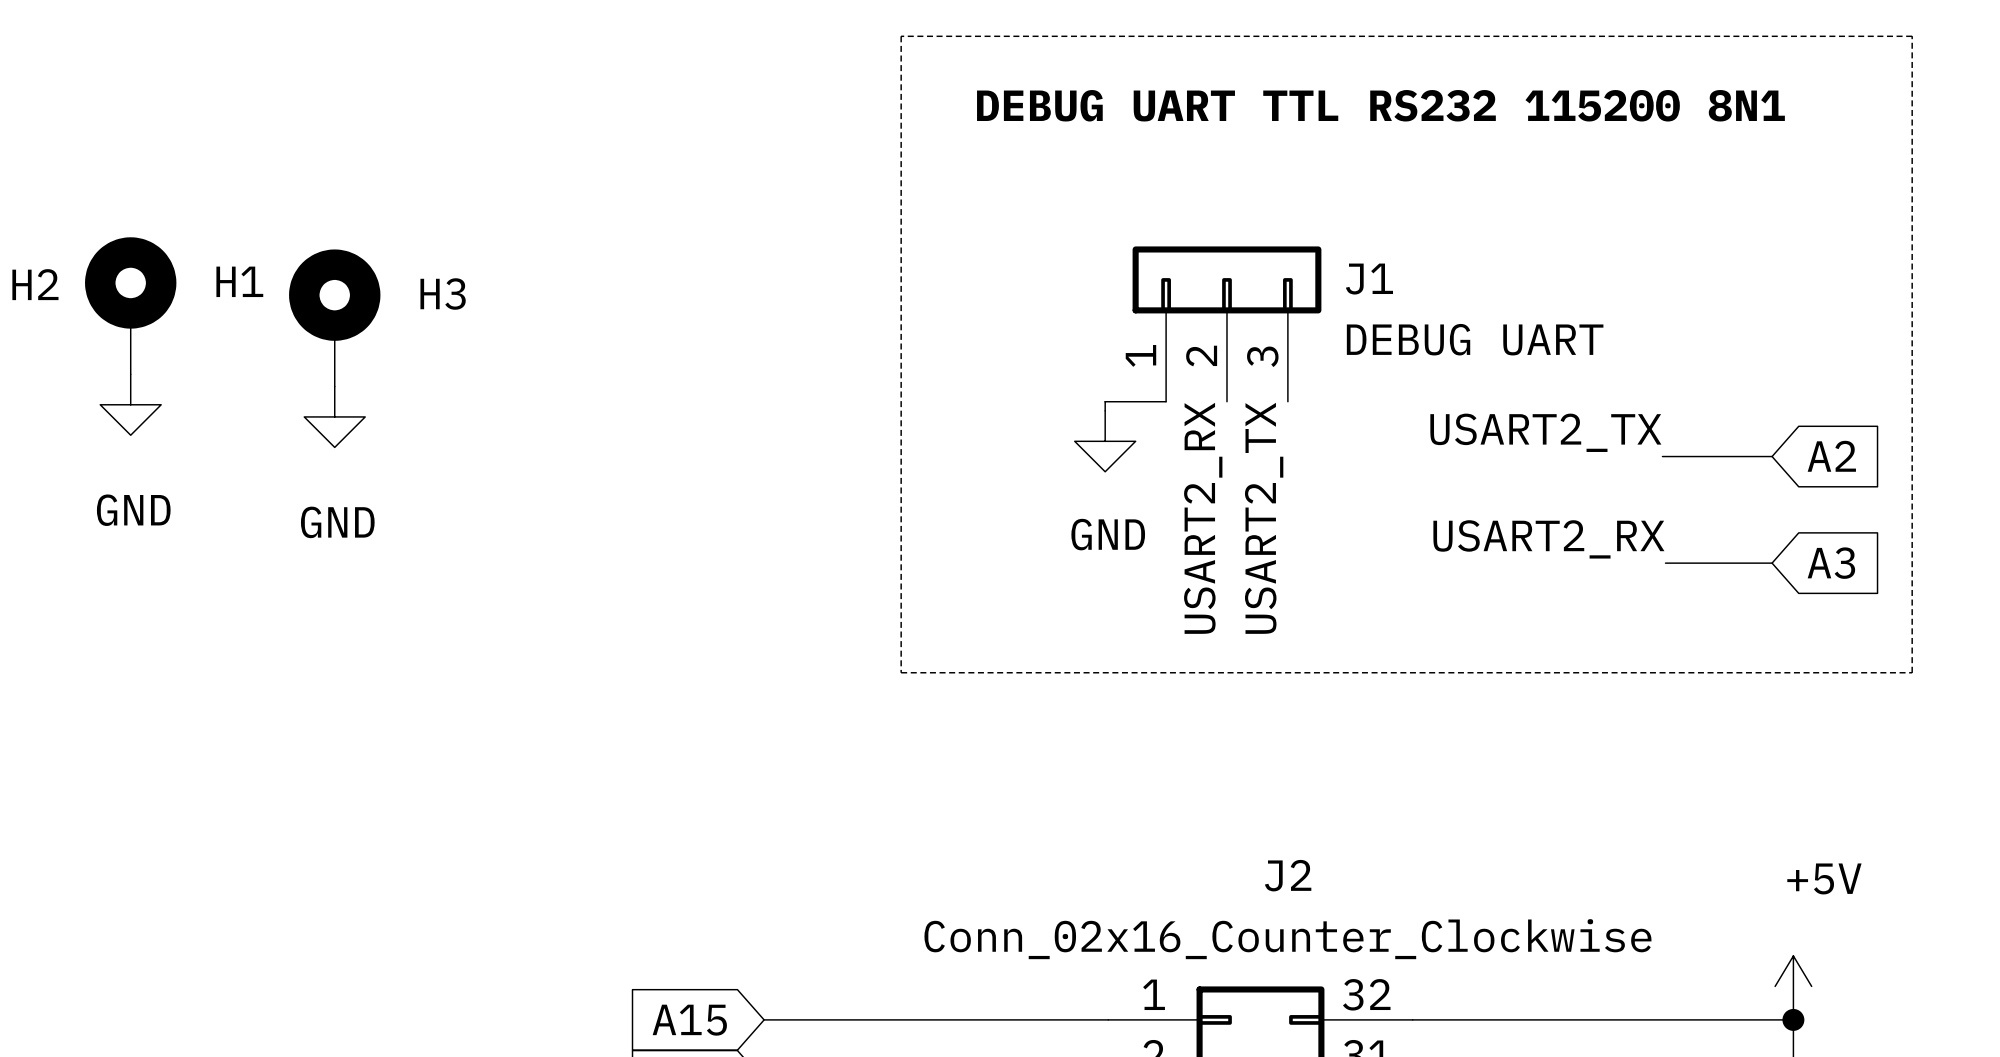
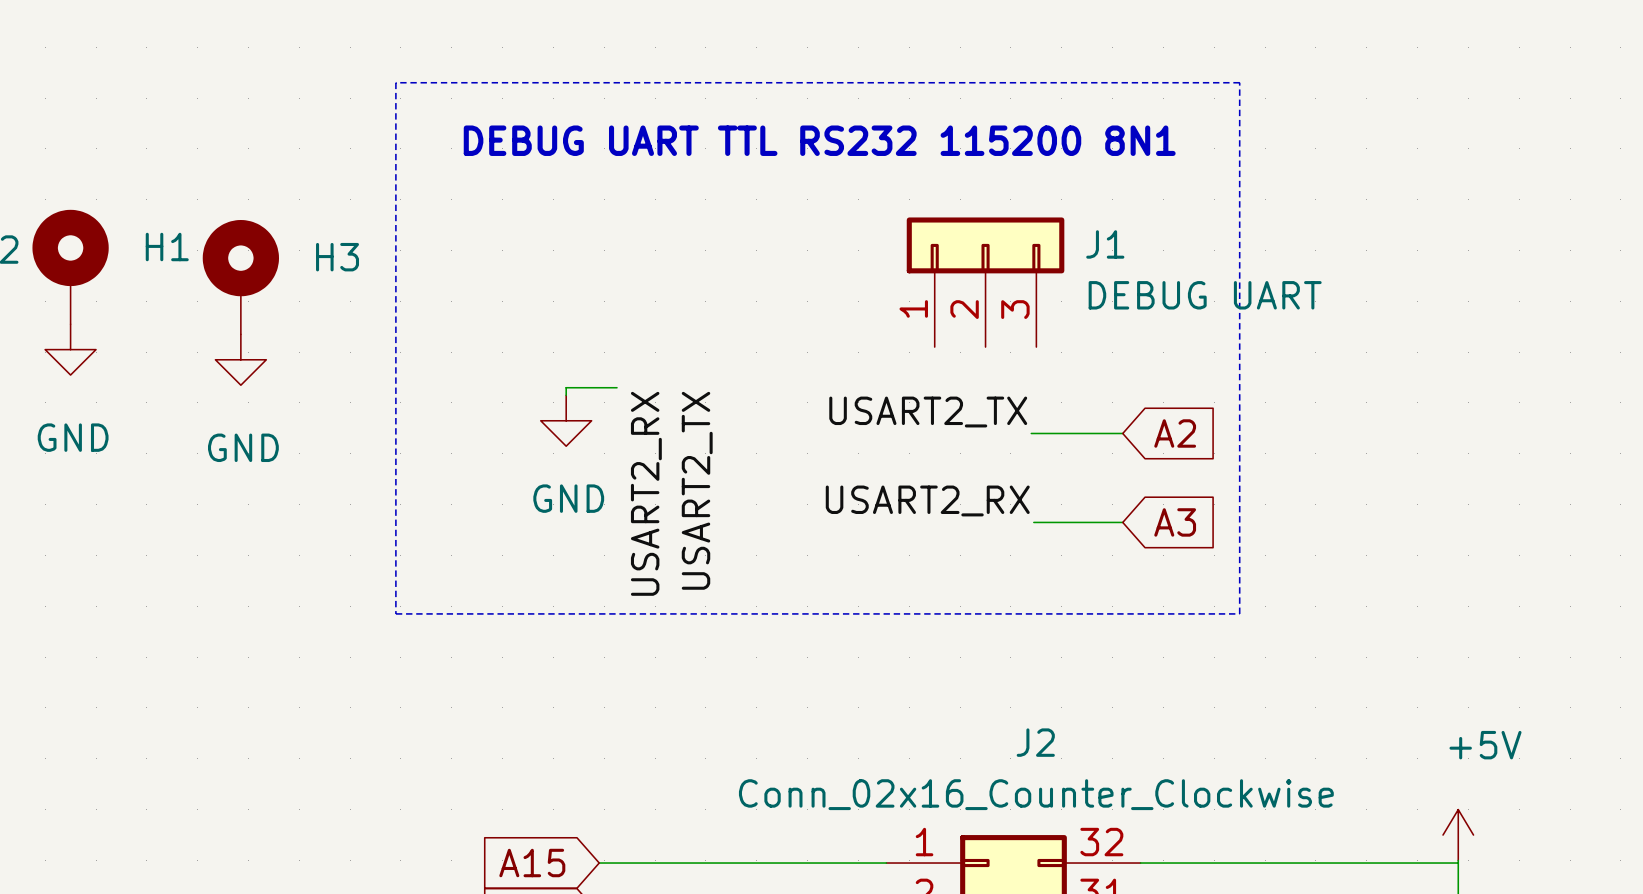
line: (901, 36) (1912, 36) (1912, 672) (901, 672) (901, 36) -> (395, 82) (1239, 82) (1239, 613) (395, 613) (395, 82)
text position: DEBUG UART TTL RS232 115200 8N1 (1380, 105) -> DEBUG UART TTL RS232 115200 8N1 (819, 140)
wire: (1166, 401) (1105, 401) (1105, 410) -> (617, 387) (566, 387) (566, 395)
label: USART2_TX (1545, 432) -> none
power symbol position: GND (1105, 441) -> GND (566, 420)
wire: (1662, 456) (1772, 456) -> (1031, 433) (1122, 433)
global label position: A2 (1831, 456) -> A2 (1175, 433)
label rotation: 0° (1203, 518) -> 90° clockwise (927, 500)
label rotation: 0° (1264, 518) -> 90° clockwise (928, 412)
label: USART2_RX (1548, 539) -> none
wire: (1665, 563) (1772, 563) -> (1033, 522) (1122, 522)
global label position: A3 (1831, 563) -> A3 (1175, 522)
label: none -> USART2_RX (646, 493)
label: none -> USART2_TX (697, 490)
junction: (1793, 1019) -> none

